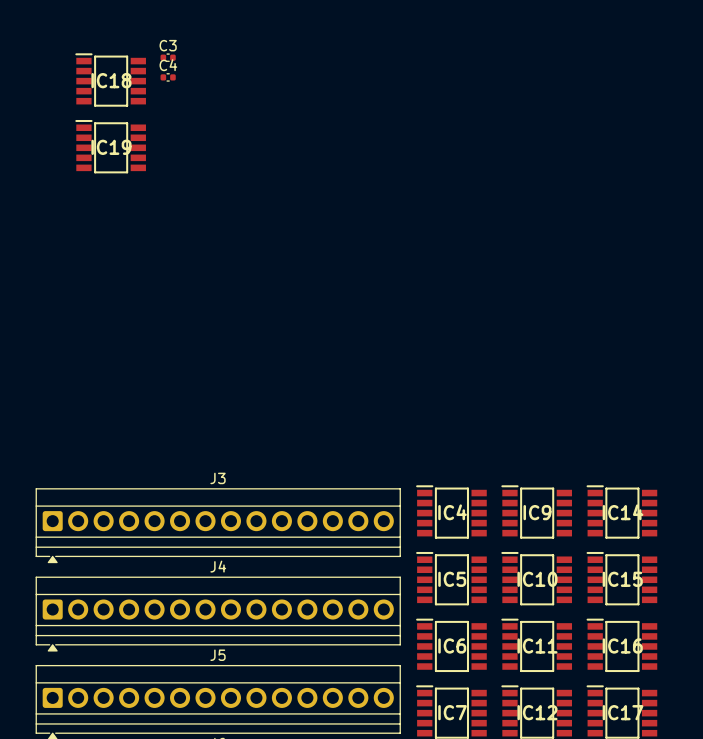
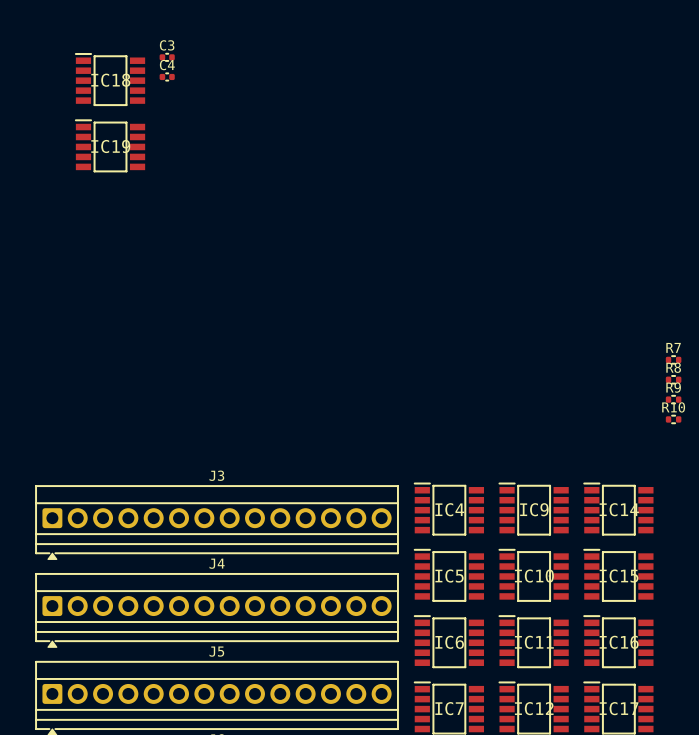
R7: none -> (673, 359)
R8: none -> (673, 379)
R9: none -> (673, 399)
R10: none -> (673, 419)

